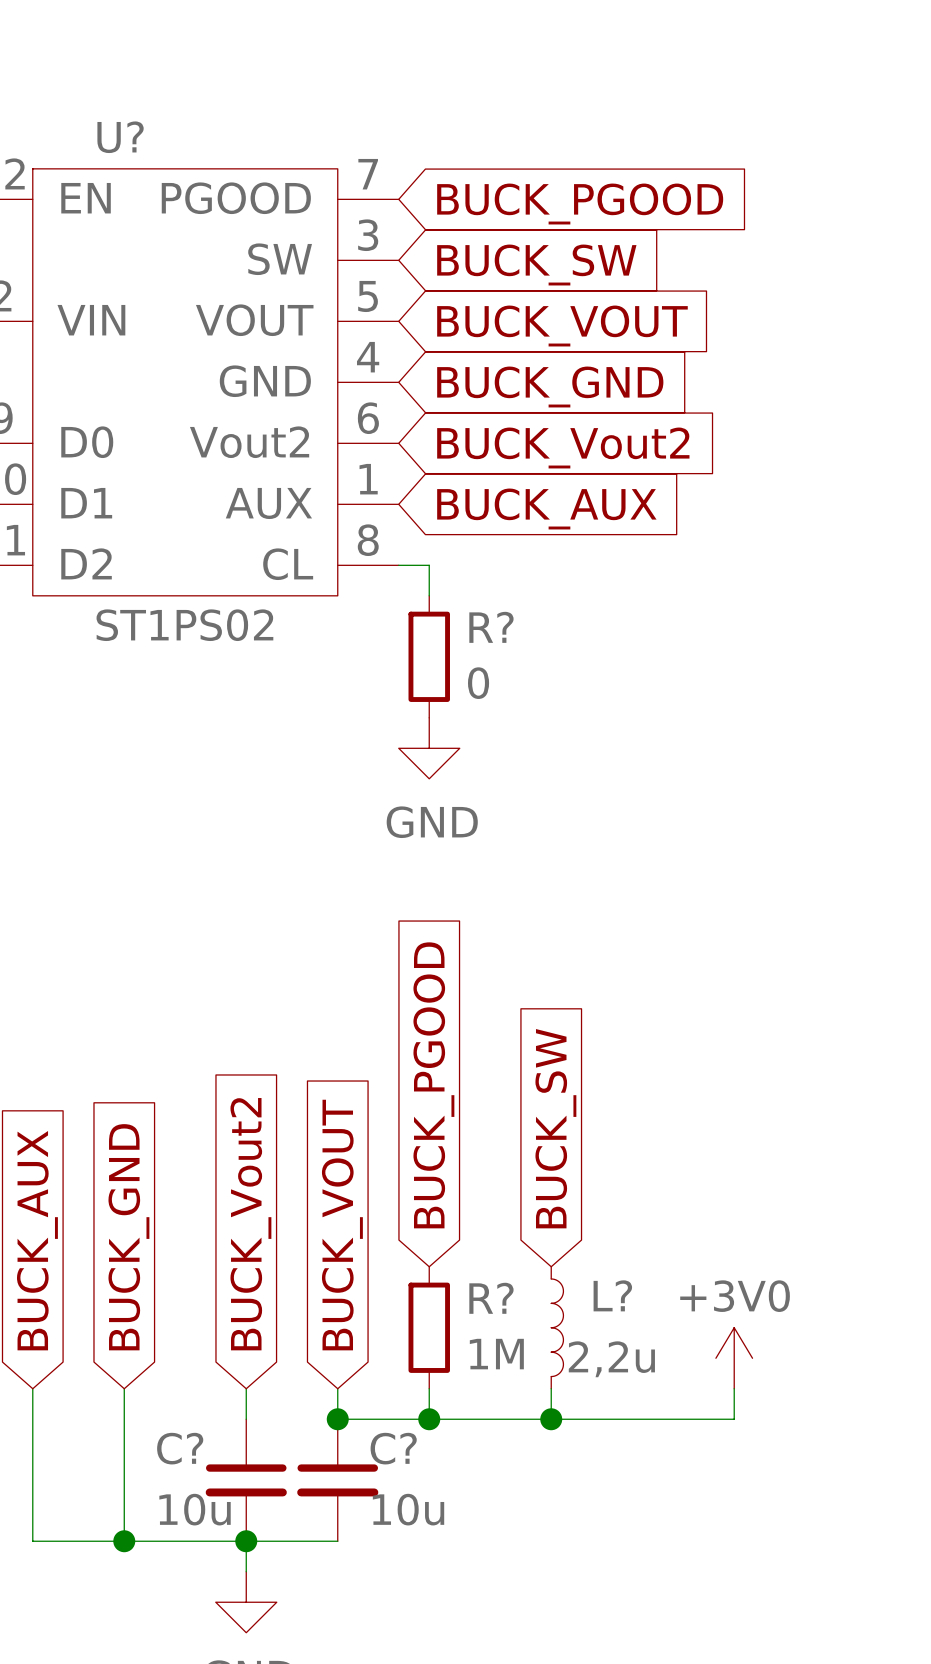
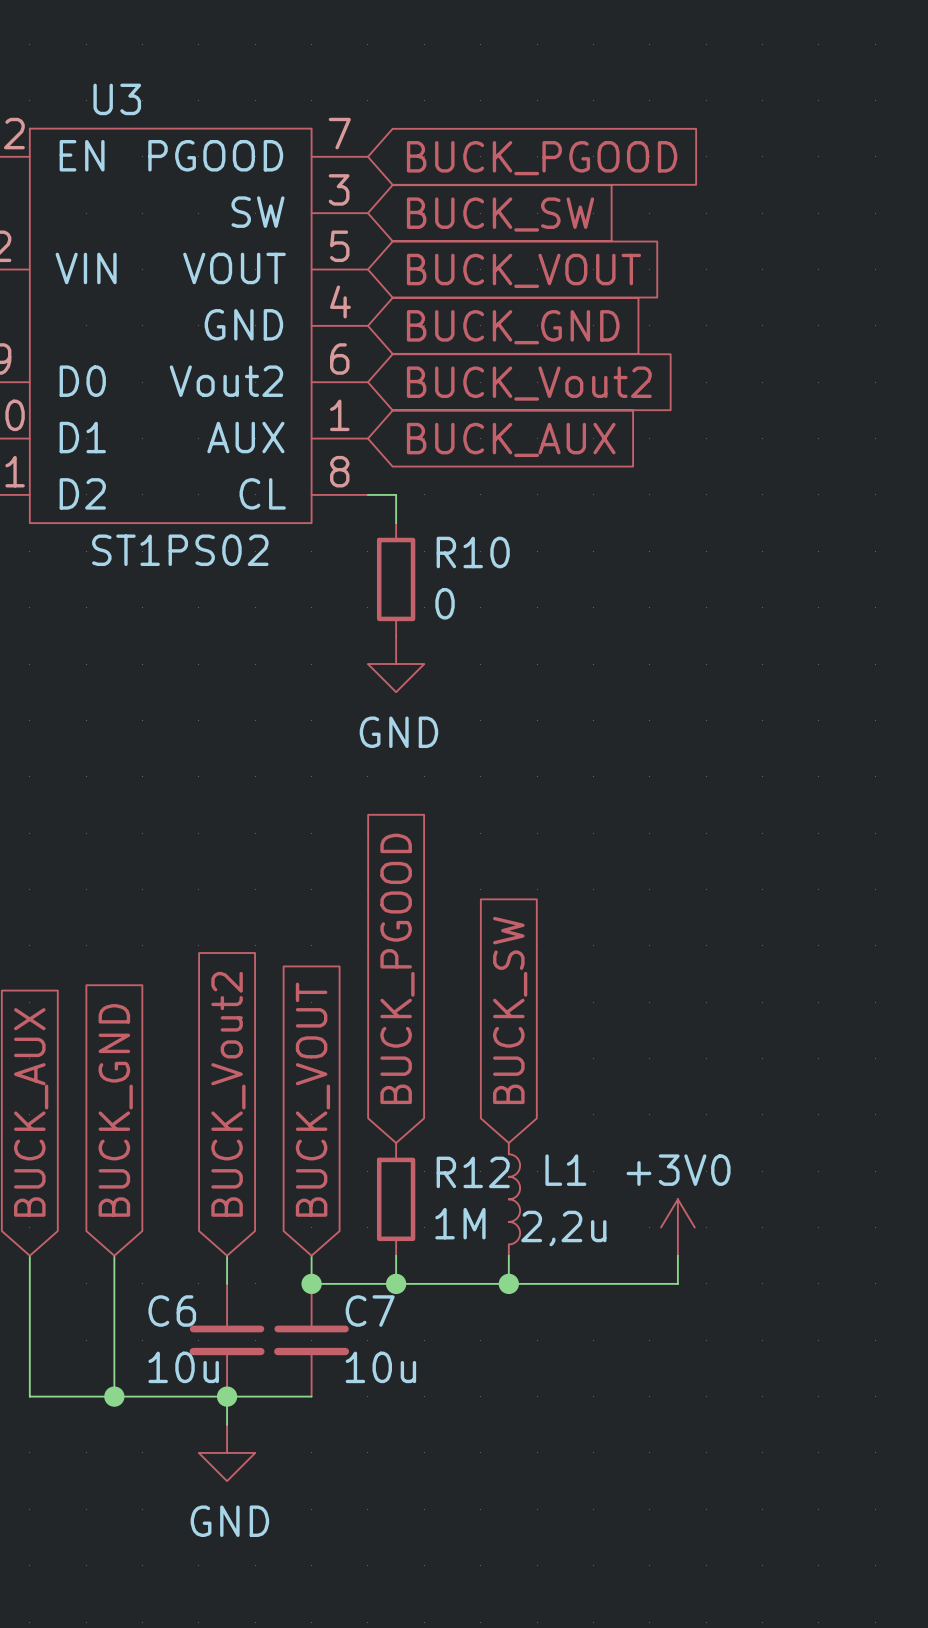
U? name: U? (120, 137) -> U3 (117, 99)
R? name: R? (491, 627) -> R10 (473, 552)
L? name: L? (612, 1295) -> L1 (565, 1170)
R? name: R? (491, 1298) -> R12 (473, 1172)
C? name: C? (180, 1448) -> C6 (172, 1311)
C? name: C? (393, 1448) -> C7 (370, 1311)

